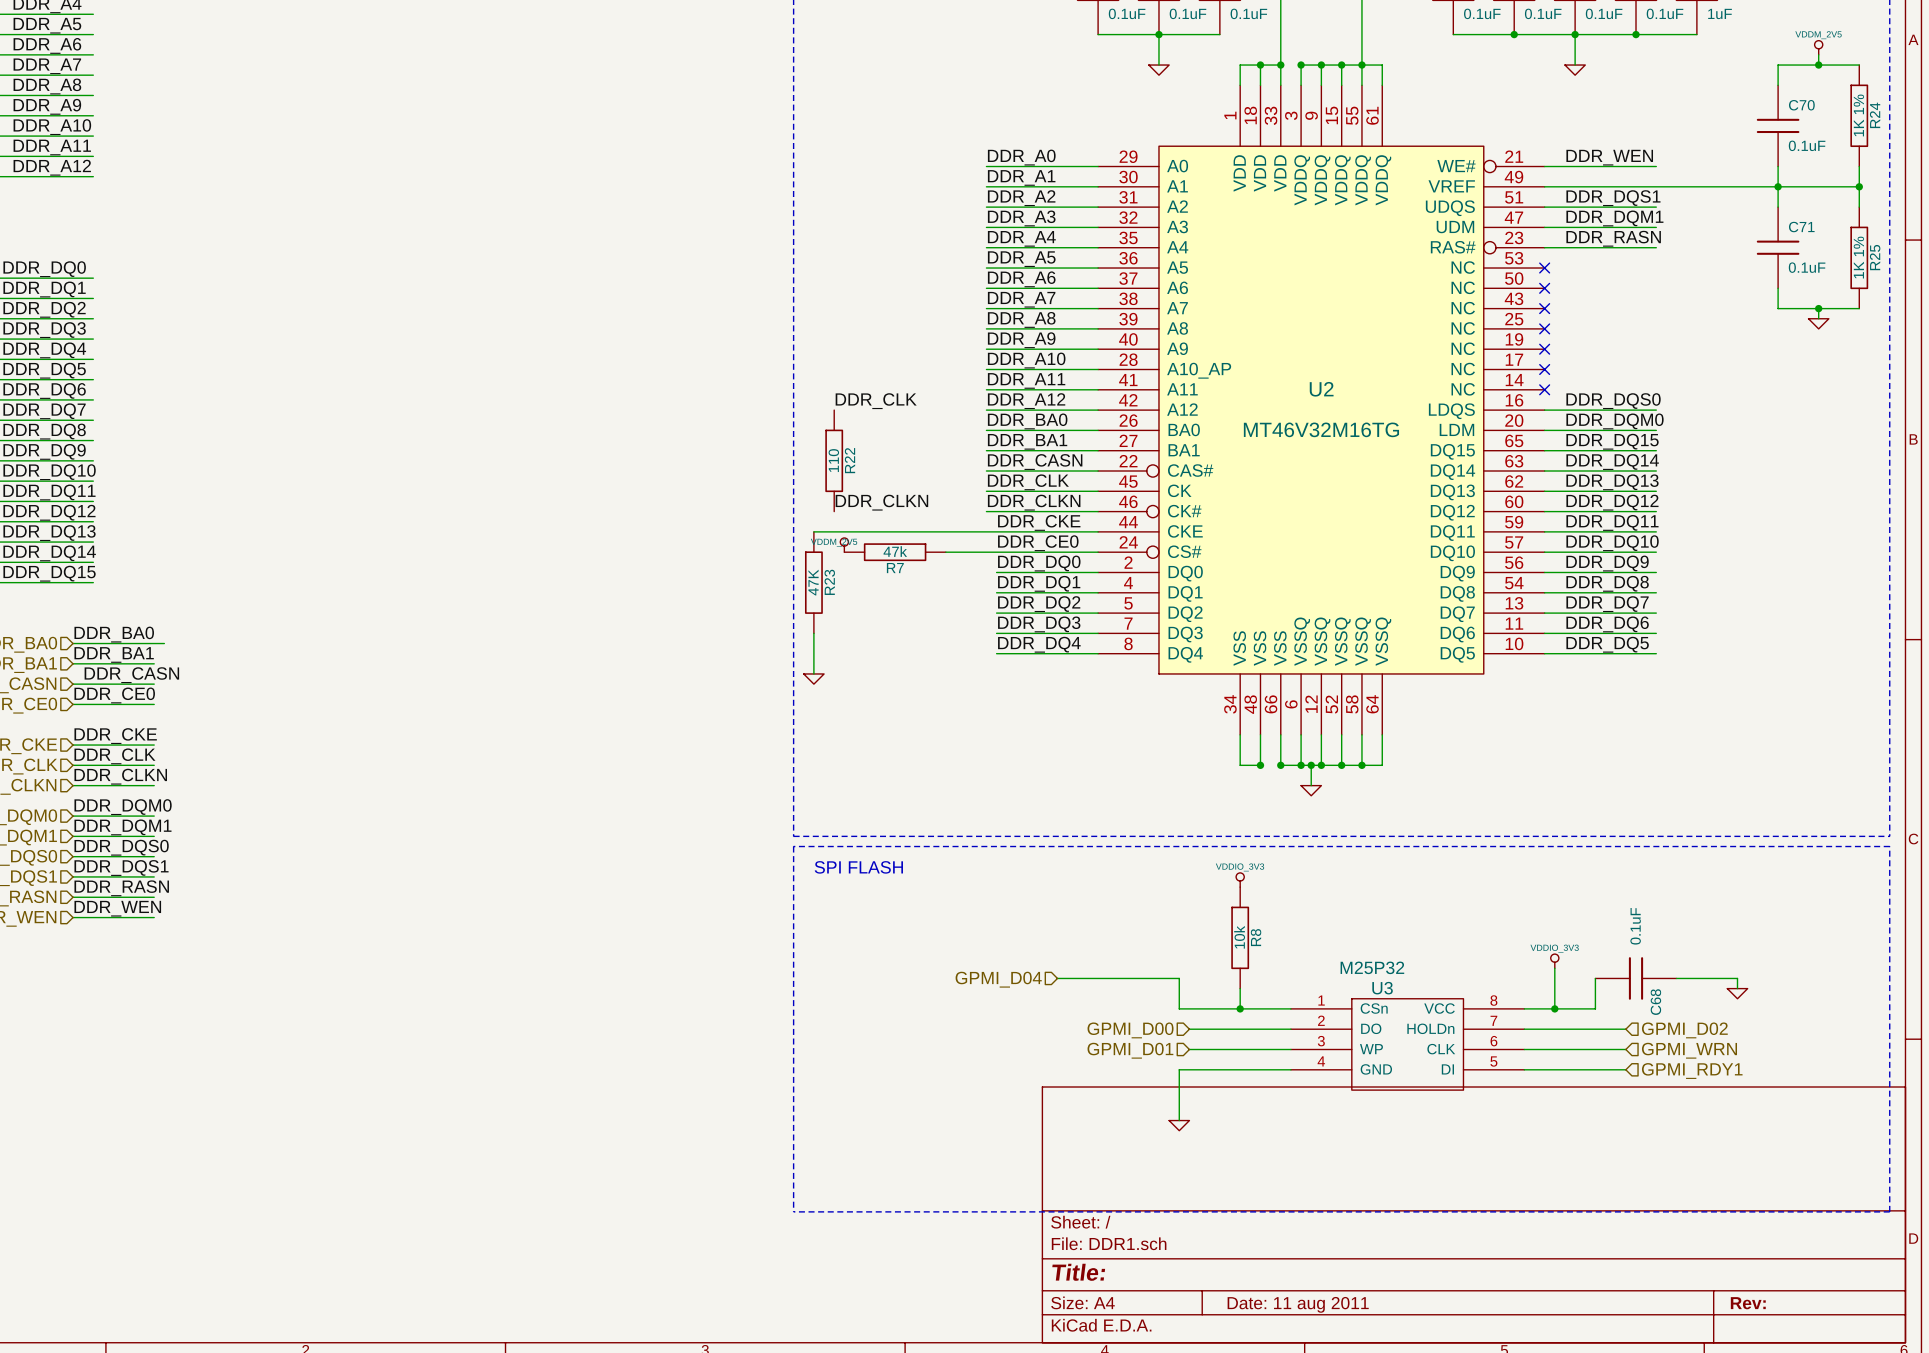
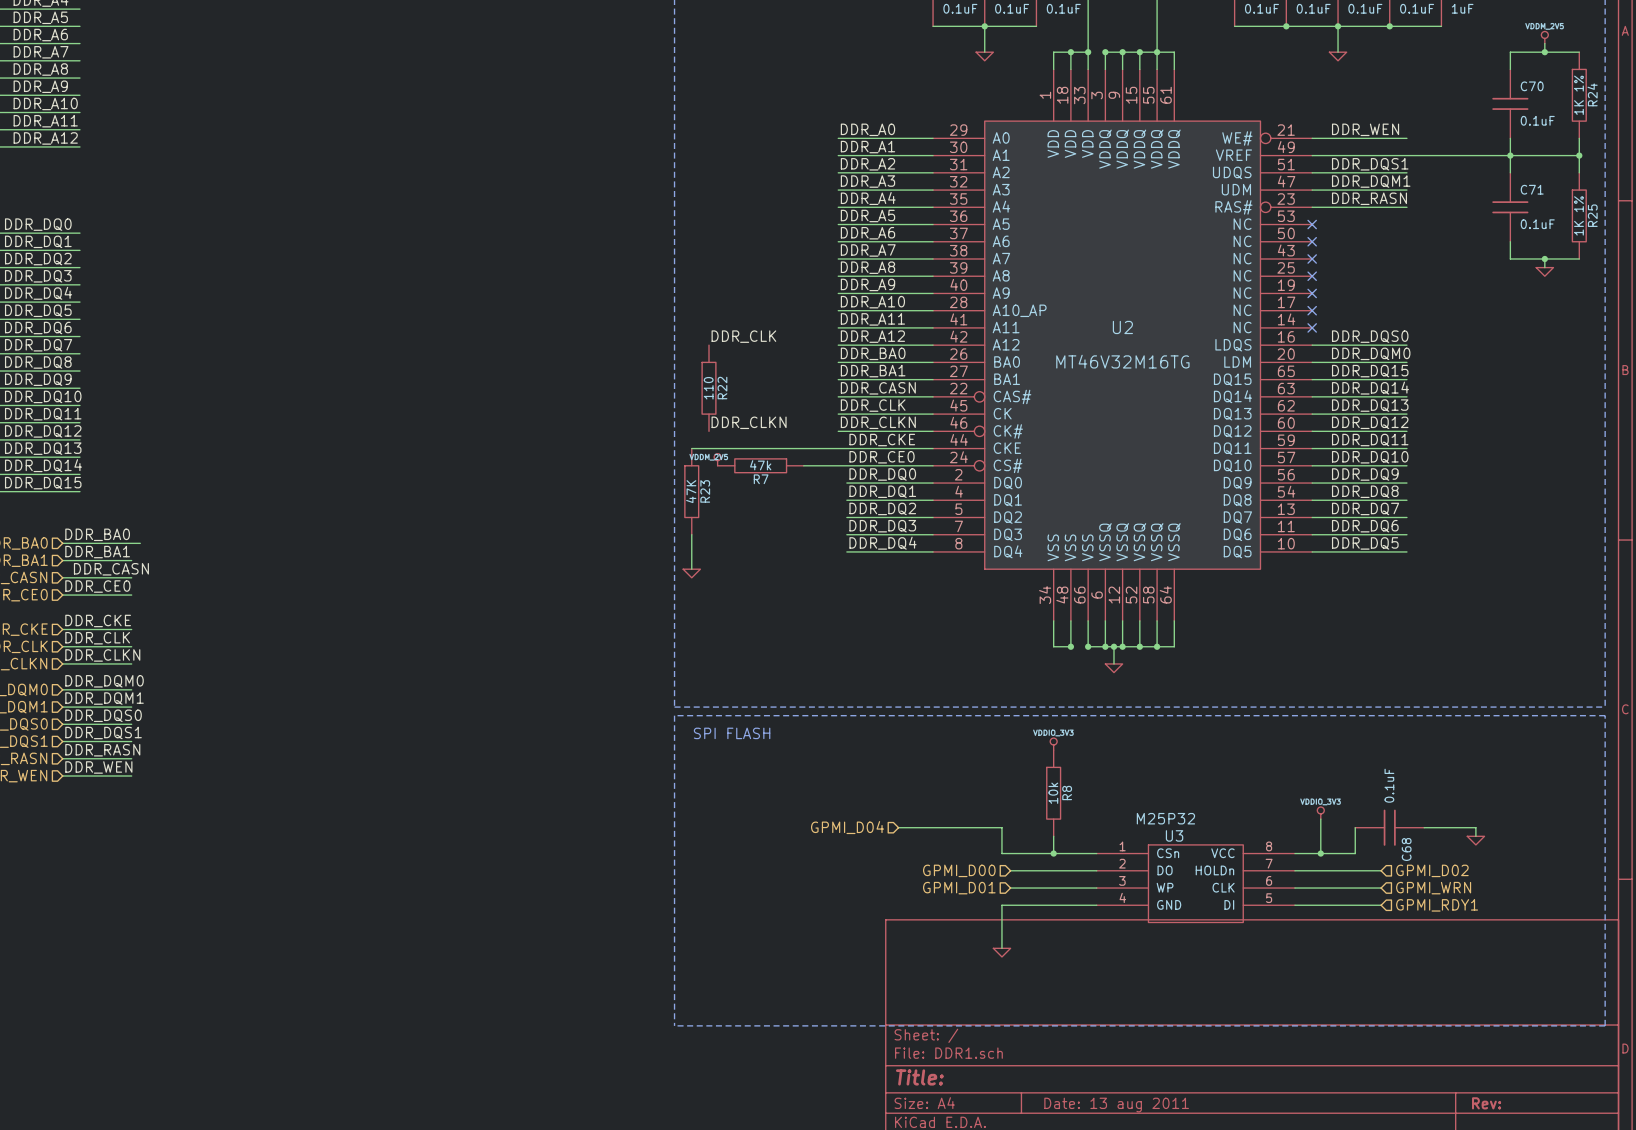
title block: Date: 11 aug 2011 (1298, 1304) -> Date: 13 aug 2011 (1116, 1105)

